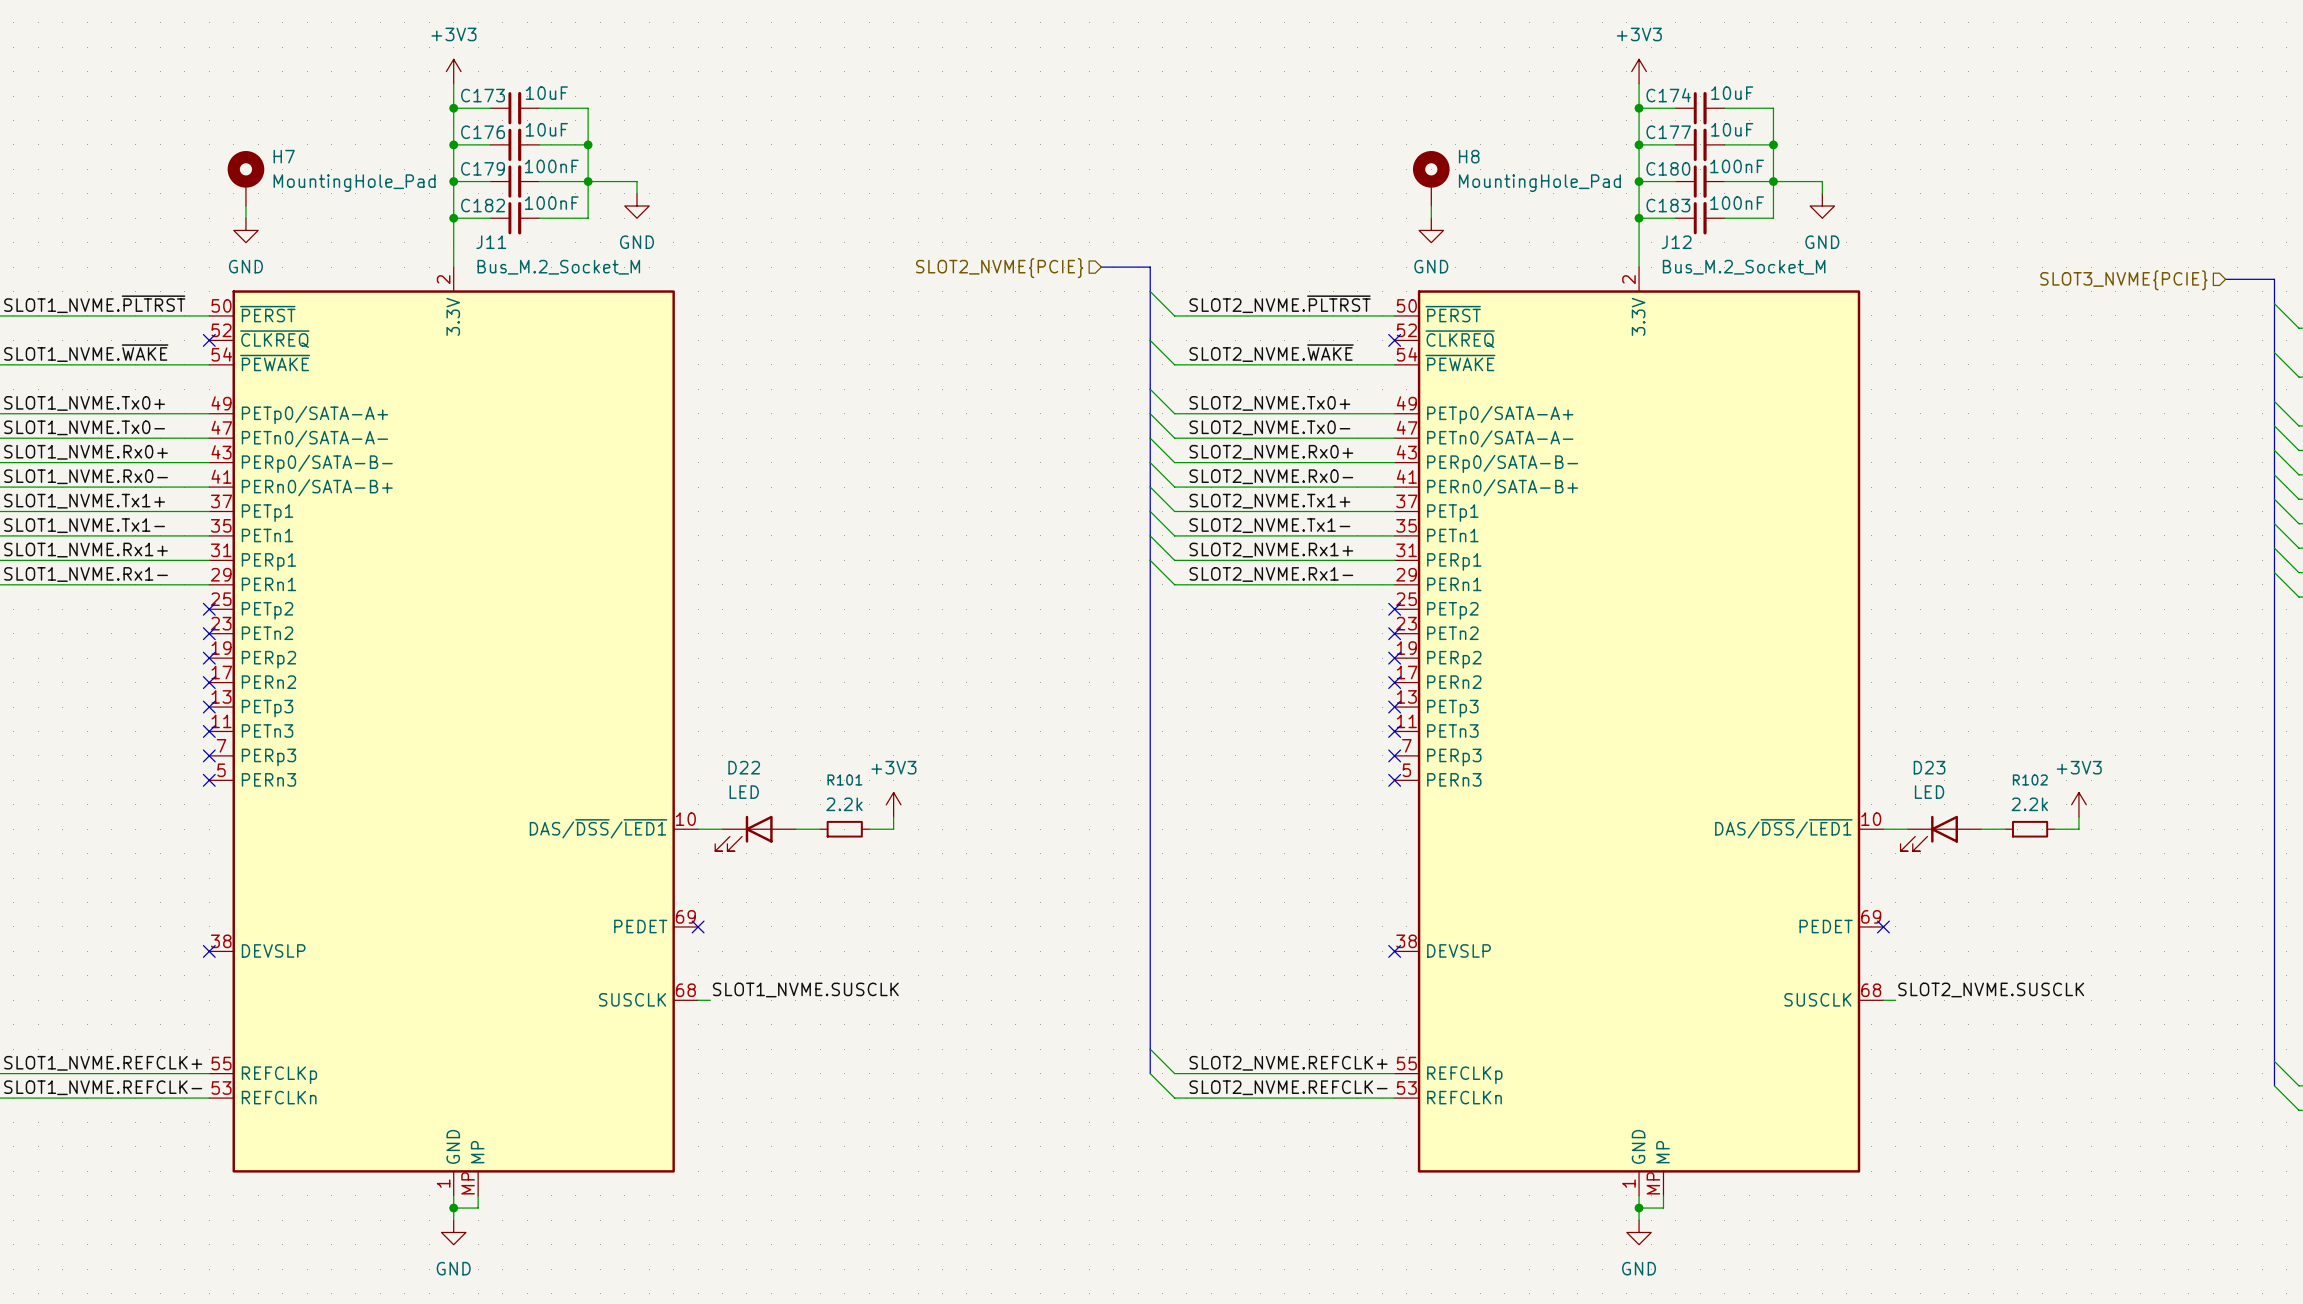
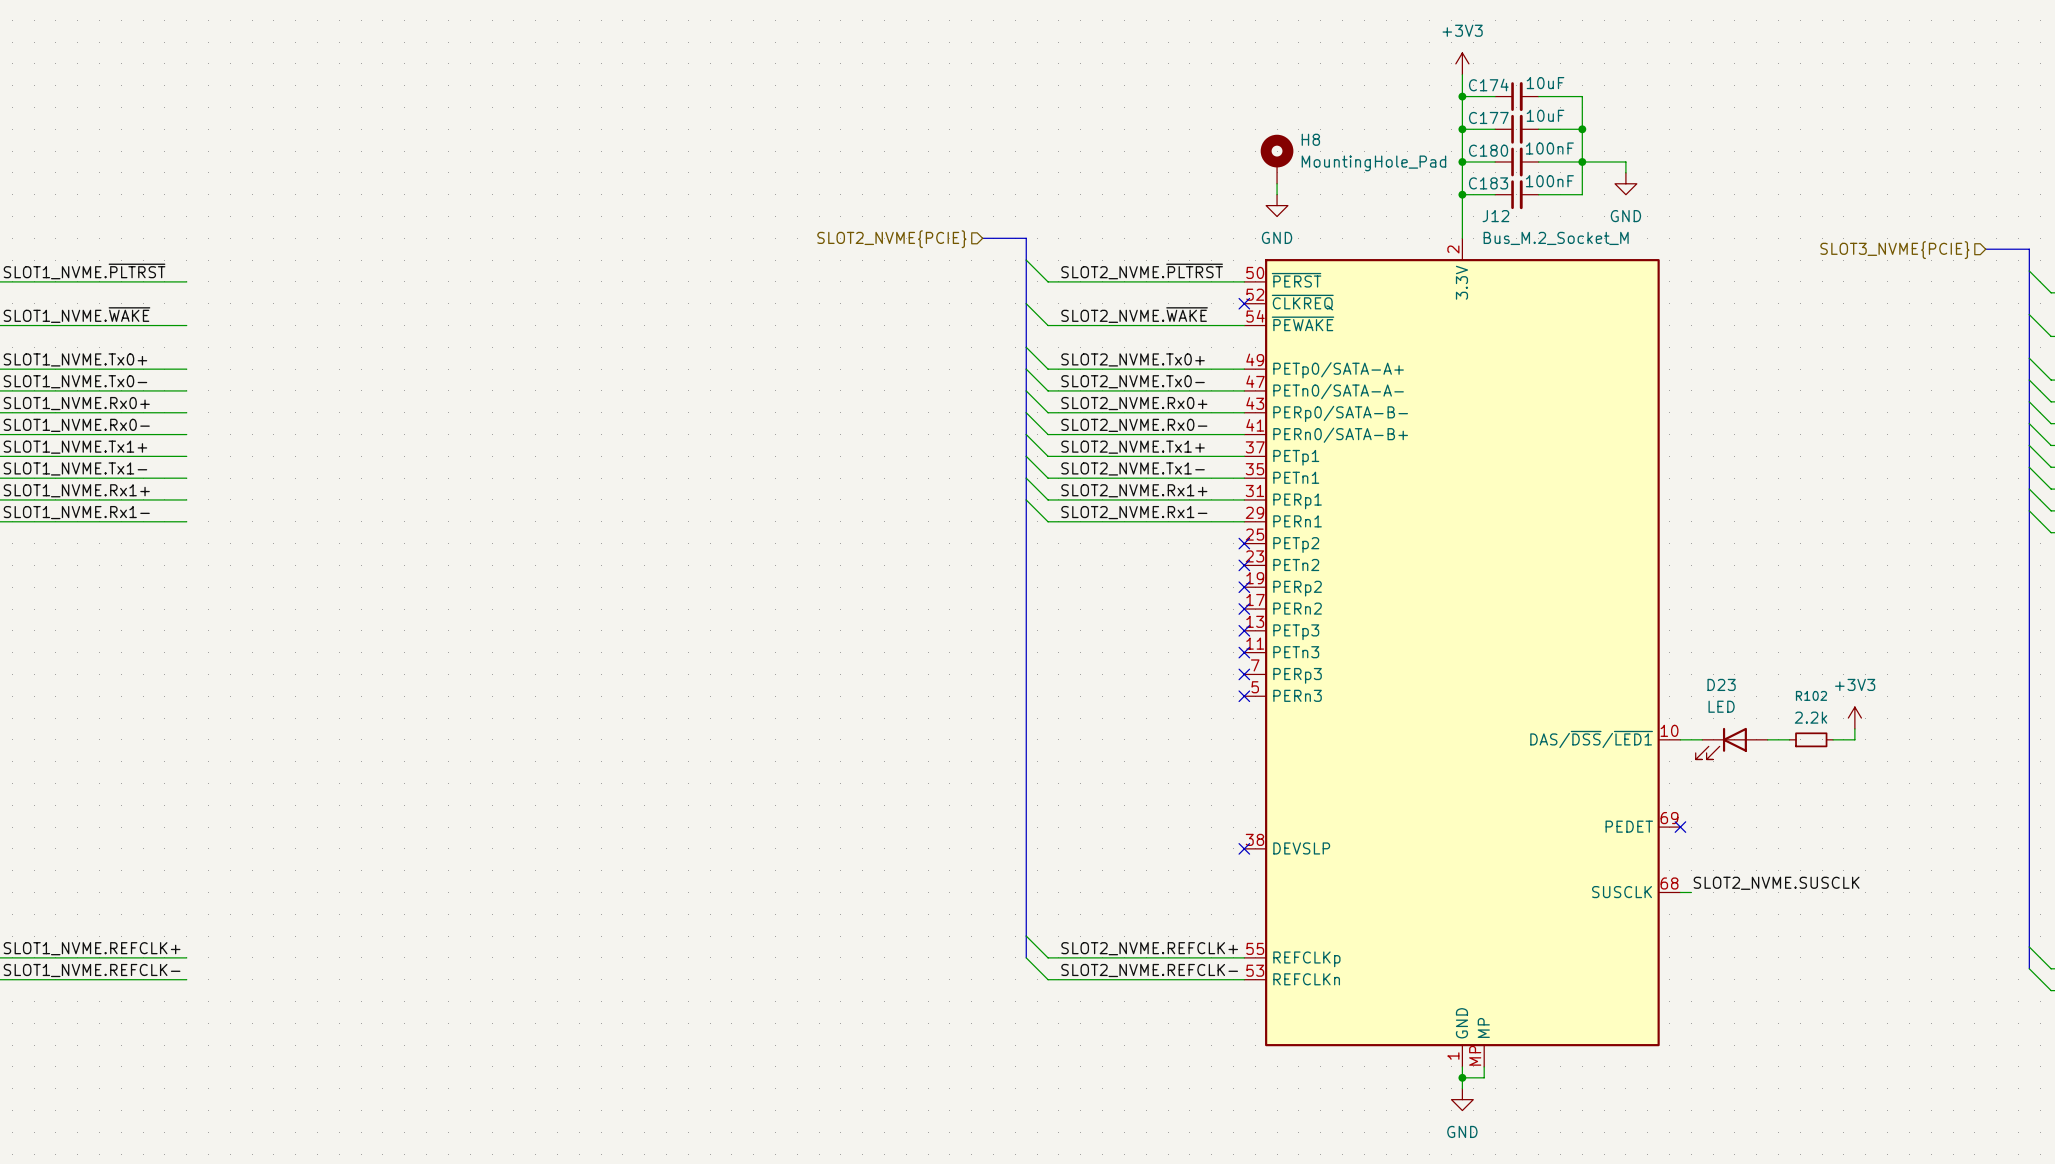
power symbol: +3V3 (453, 71) -> none
wire: (453, 83) (453, 267) -> none
wire: (453, 108) (490, 108) -> none
junction: (453, 108) -> none
C173: 10uF (514, 108) -> none
wire: (539, 108) (588, 108) (588, 218) (539, 218) -> none
wire: (453, 144) (490, 144) -> none
junction: (453, 144) -> none
C176: 10uF (514, 144) -> none
wire: (539, 144) (588, 144) -> none
junction: (588, 144) -> none
H7: MountingHole_Pad (245, 178) -> none
wire: (453, 181) (490, 181) -> none
junction: (453, 181) -> none
C179: 100nF (514, 181) -> none
wire: (539, 181) (637, 181) (637, 193) -> none
junction: (588, 181) -> none
wire: (245, 206) (245, 218) -> none
power symbol: GND (637, 206) -> none
wire: (453, 218) (490, 218) -> none
junction: (453, 218) -> none
C182: 100nF (514, 218) -> none
power symbol: GND (245, 230) -> none
no-connect mark: (209, 340) -> none
no-connect mark: (209, 609) -> none
no-connect mark: (209, 633) -> none
no-connect mark: (209, 658) -> none
no-connect mark: (209, 682) -> none
no-connect mark: (209, 707) -> none
no-connect mark: (209, 731) -> none
J11: Bus_M.2_Socket_M (453, 731) -> none
no-connect mark: (209, 755) -> none
no-connect mark: (209, 780) -> none
power symbol: +3V3 (893, 804) -> none
wire: (893, 817) (893, 829) (869, 829) -> none
wire: (698, 829) (722, 829) -> none
wire: (795, 829) (820, 829) -> none
R101: 2.2k (844, 829) -> none
D22: LED (755, 833) -> none
no-connect mark: (698, 926) -> none
no-connect mark: (209, 951) -> none
label: SLOT1_NVME.SUSCLK (805, 989) -> none
wire: (698, 1000) (710, 1000) -> none
wire: (453, 1195) (453, 1220) -> none
wire: (478, 1195) (478, 1208) (453, 1208) -> none
junction: (453, 1208) -> none
power symbol: GND (453, 1232) -> none

